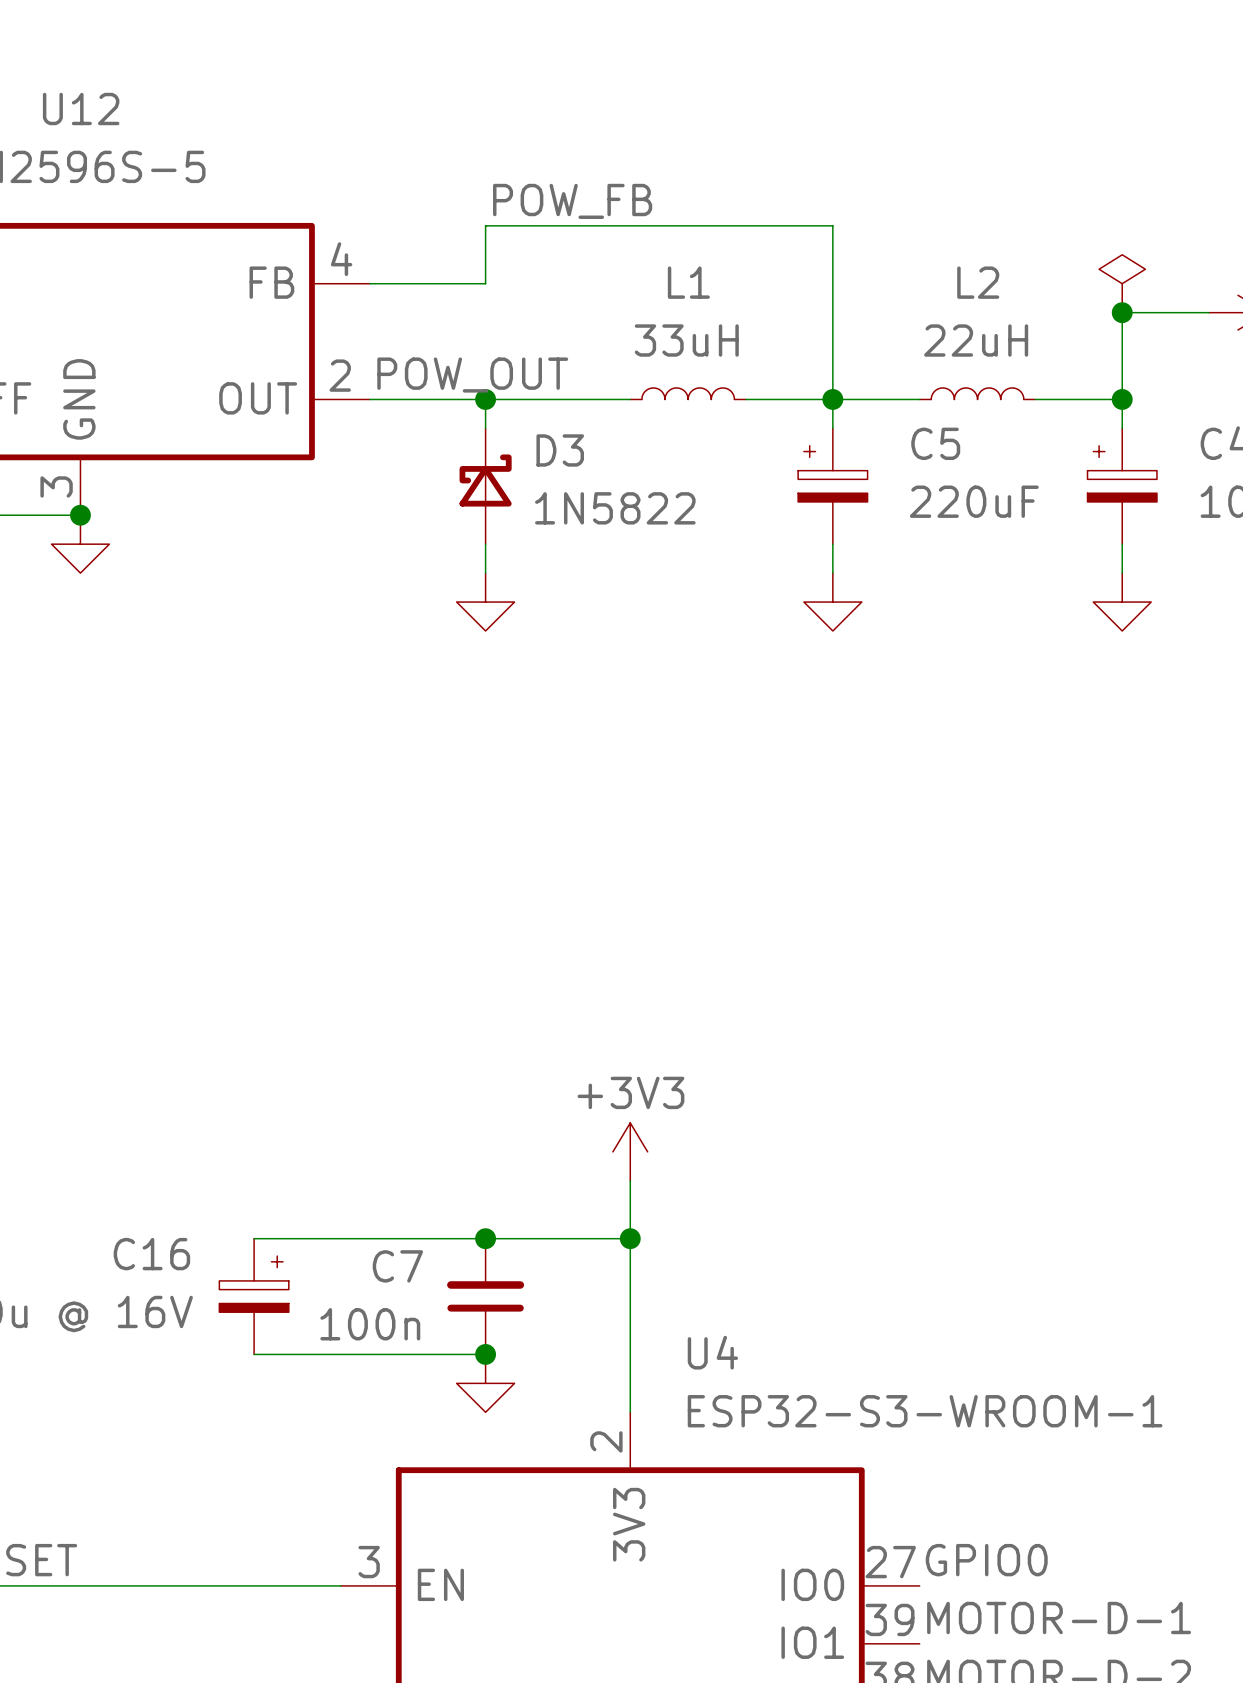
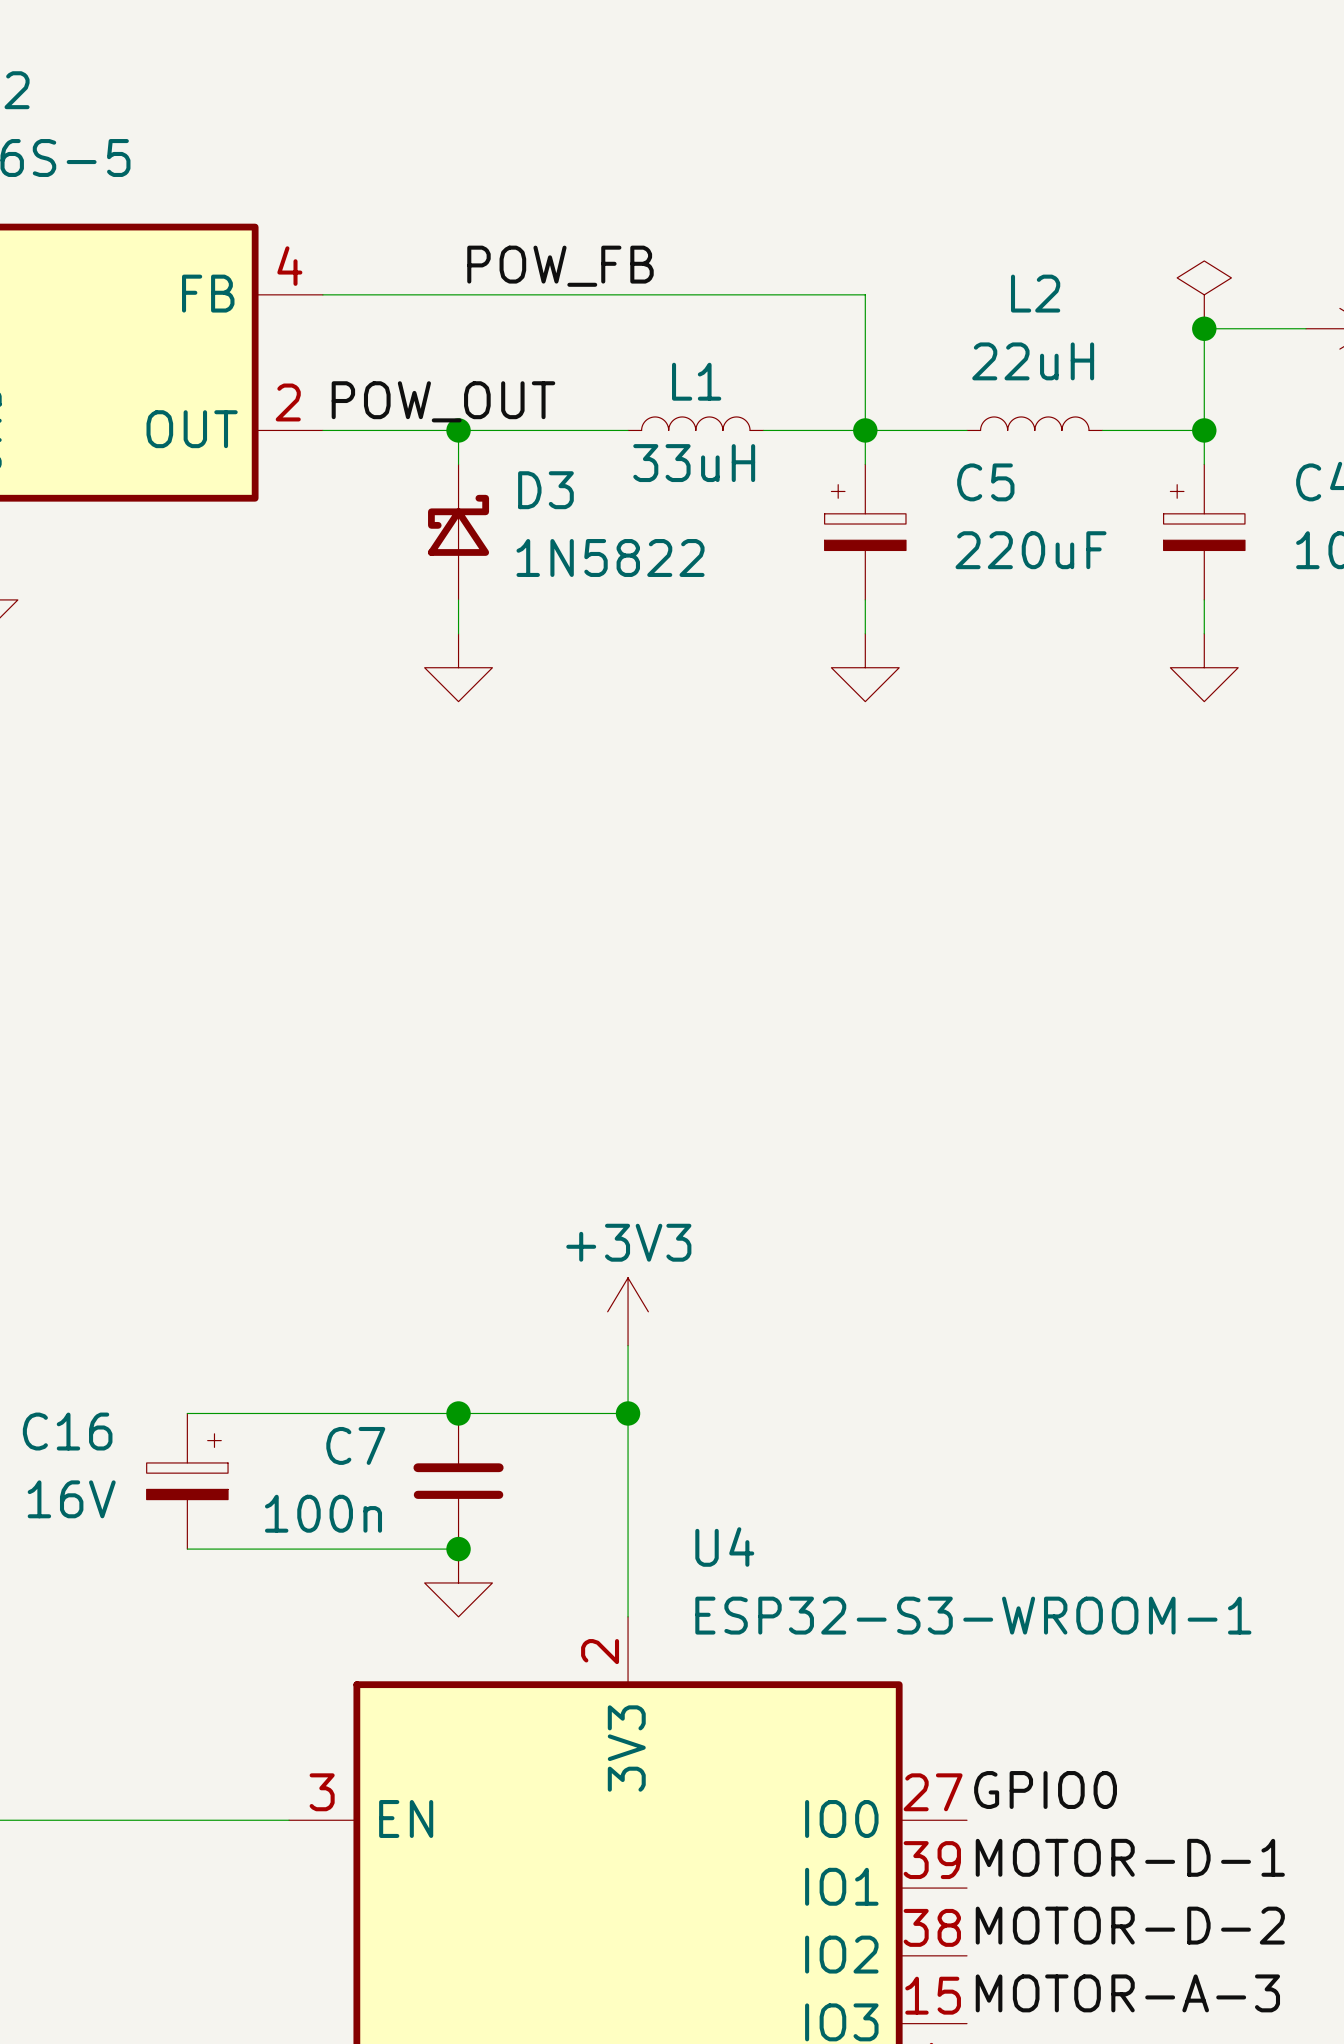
label position: POW_FB (572, 201) -> POW_FB (560, 266)
L1 name position: L1 (688, 282) -> L1 (696, 381)
wire: (485, 283) (485, 225) (832, 225) (832, 283) -> (458, 294) (865, 294)
L1 value position: 33uH (686, 340) -> 33uH (694, 463)

